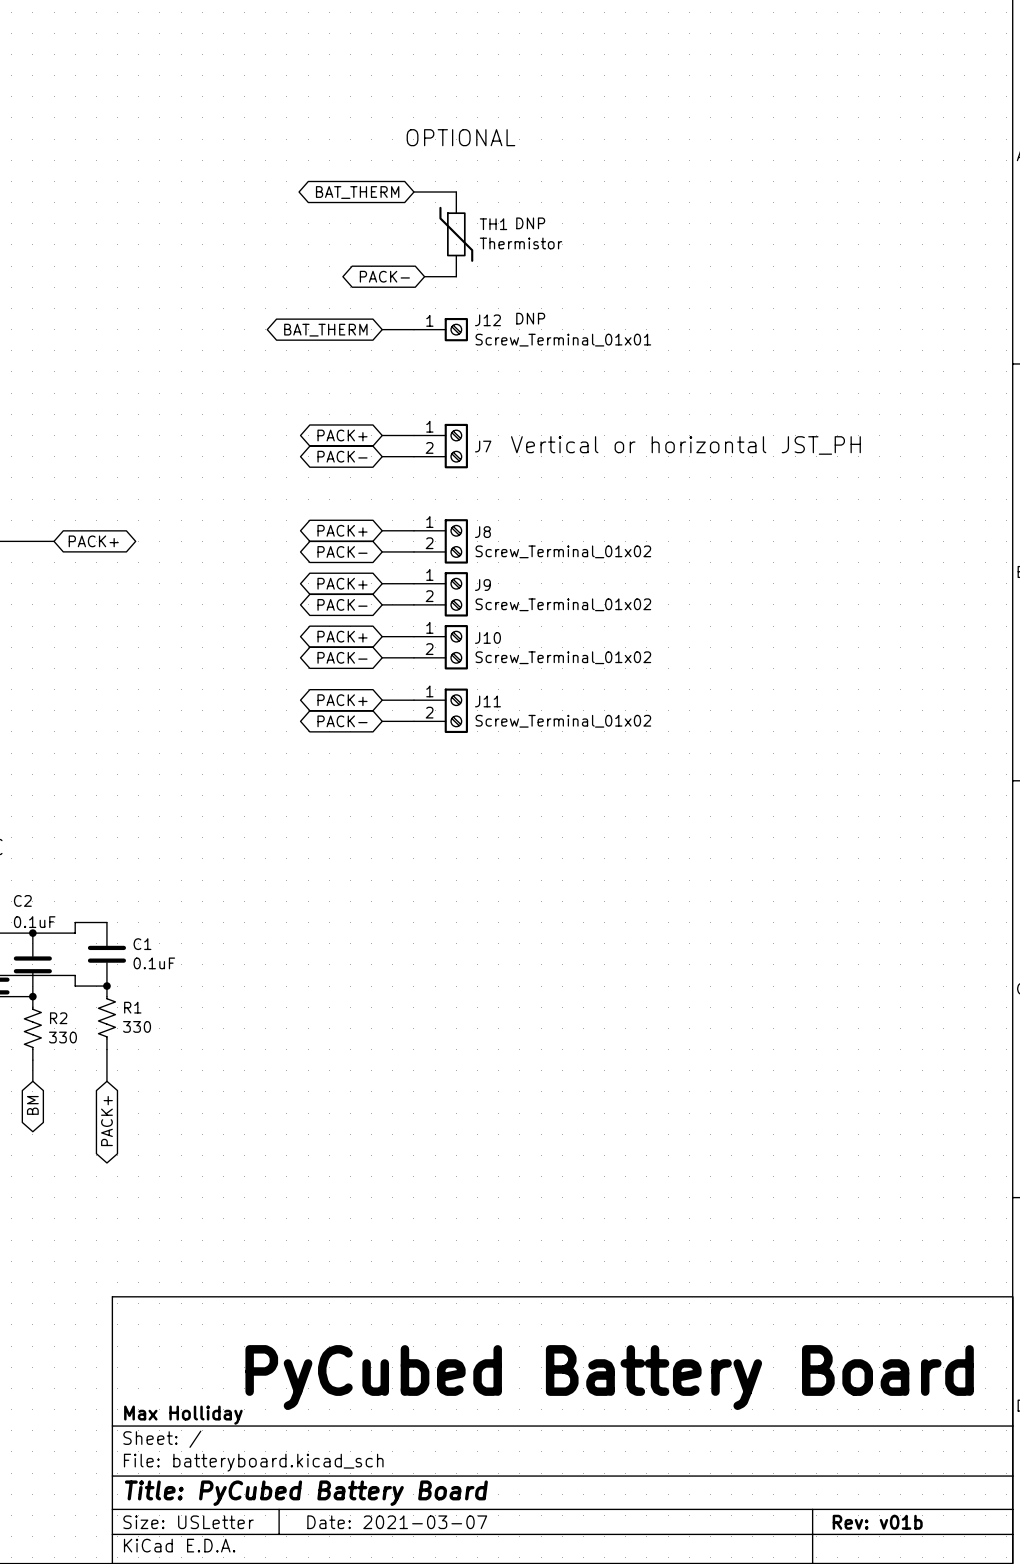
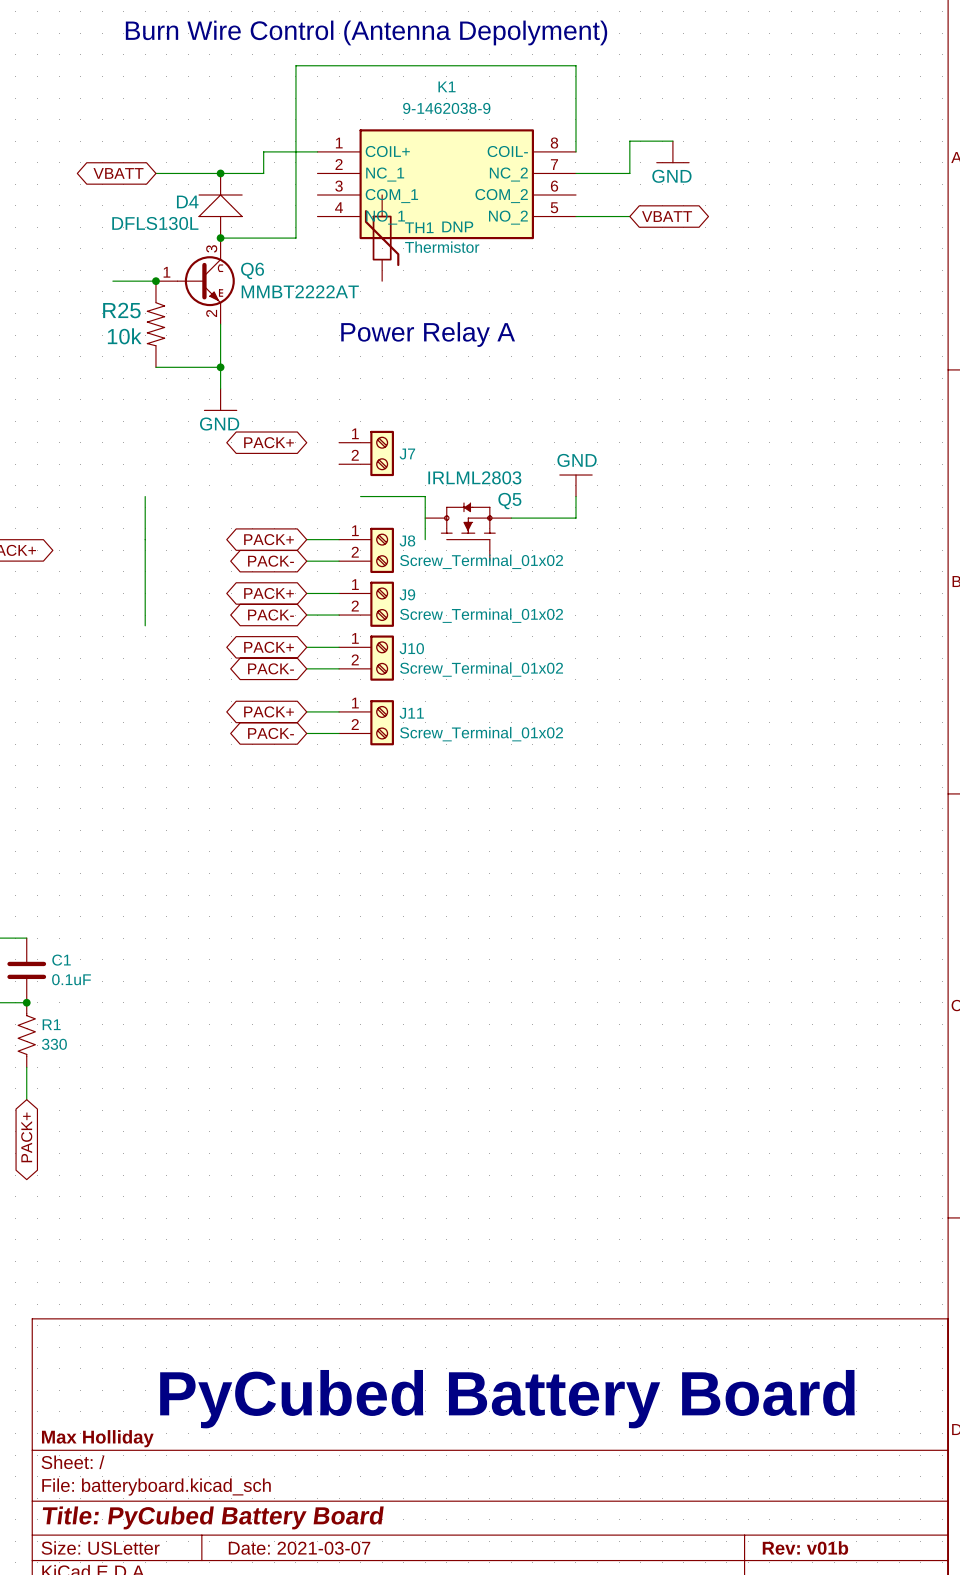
text: none -> Burn Wire Control (Antenna Depolyment) (366, 32)
text: OPTIONAL (460, 137) -> none
wire: none -> (672, 141) (629, 141) (629, 173) (575, 173)
wire: none -> (317, 151) (263, 151) (263, 173) (155, 173)
wire: none -> (575, 151) (575, 65) (295, 65) (295, 238) (220, 238)
power symbol: none -> GND (672, 151)
global label: none -> VBATT (118, 173)
junction: none -> (220, 173)
K1: none -> 9-1462038-9 (446, 184)
global label: BAT_THERM (357, 192) -> none
D4: none -> DFLS130L (220, 205)
wire: none -> (575, 216) (629, 216)
global label: none -> VBATT (667, 216)
junction: none -> (220, 238)
wire: none -> (112, 281) (155, 281)
junction: none -> (155, 281)
Q6: none -> MMBT2222AT (195, 281)
global label: PACK- (384, 276) -> none
wire: (424, 276) (456, 276) -> none
R25: none -> 10k (155, 324)
wire: none -> (220, 324) (220, 388)
wire: (382, 329) (413, 329) -> none
J12: Screw_Terminal_01x01 (440, 329) -> none
text: none -> Power Relay A (428, 334)
global label: BAT_THERM (325, 330) -> none
wire: none -> (155, 367) (220, 367)
junction: none -> (220, 367)
power symbol: none -> GND (220, 399)
wire: (382, 435) (413, 435) -> none
text: Vertical or horizontal JST_PH (685, 445) -> none
global label: PACK- (342, 456) -> none
wire: (382, 456) (413, 456) -> none
power symbol: none -> GND (575, 485)
wire: none -> (145, 496) (145, 625)
wire: none -> (360, 496) (425, 496) (425, 539)
wire: none -> (575, 496) (575, 518) (511, 518)
Q5: none -> IRLML2803 (468, 532)

